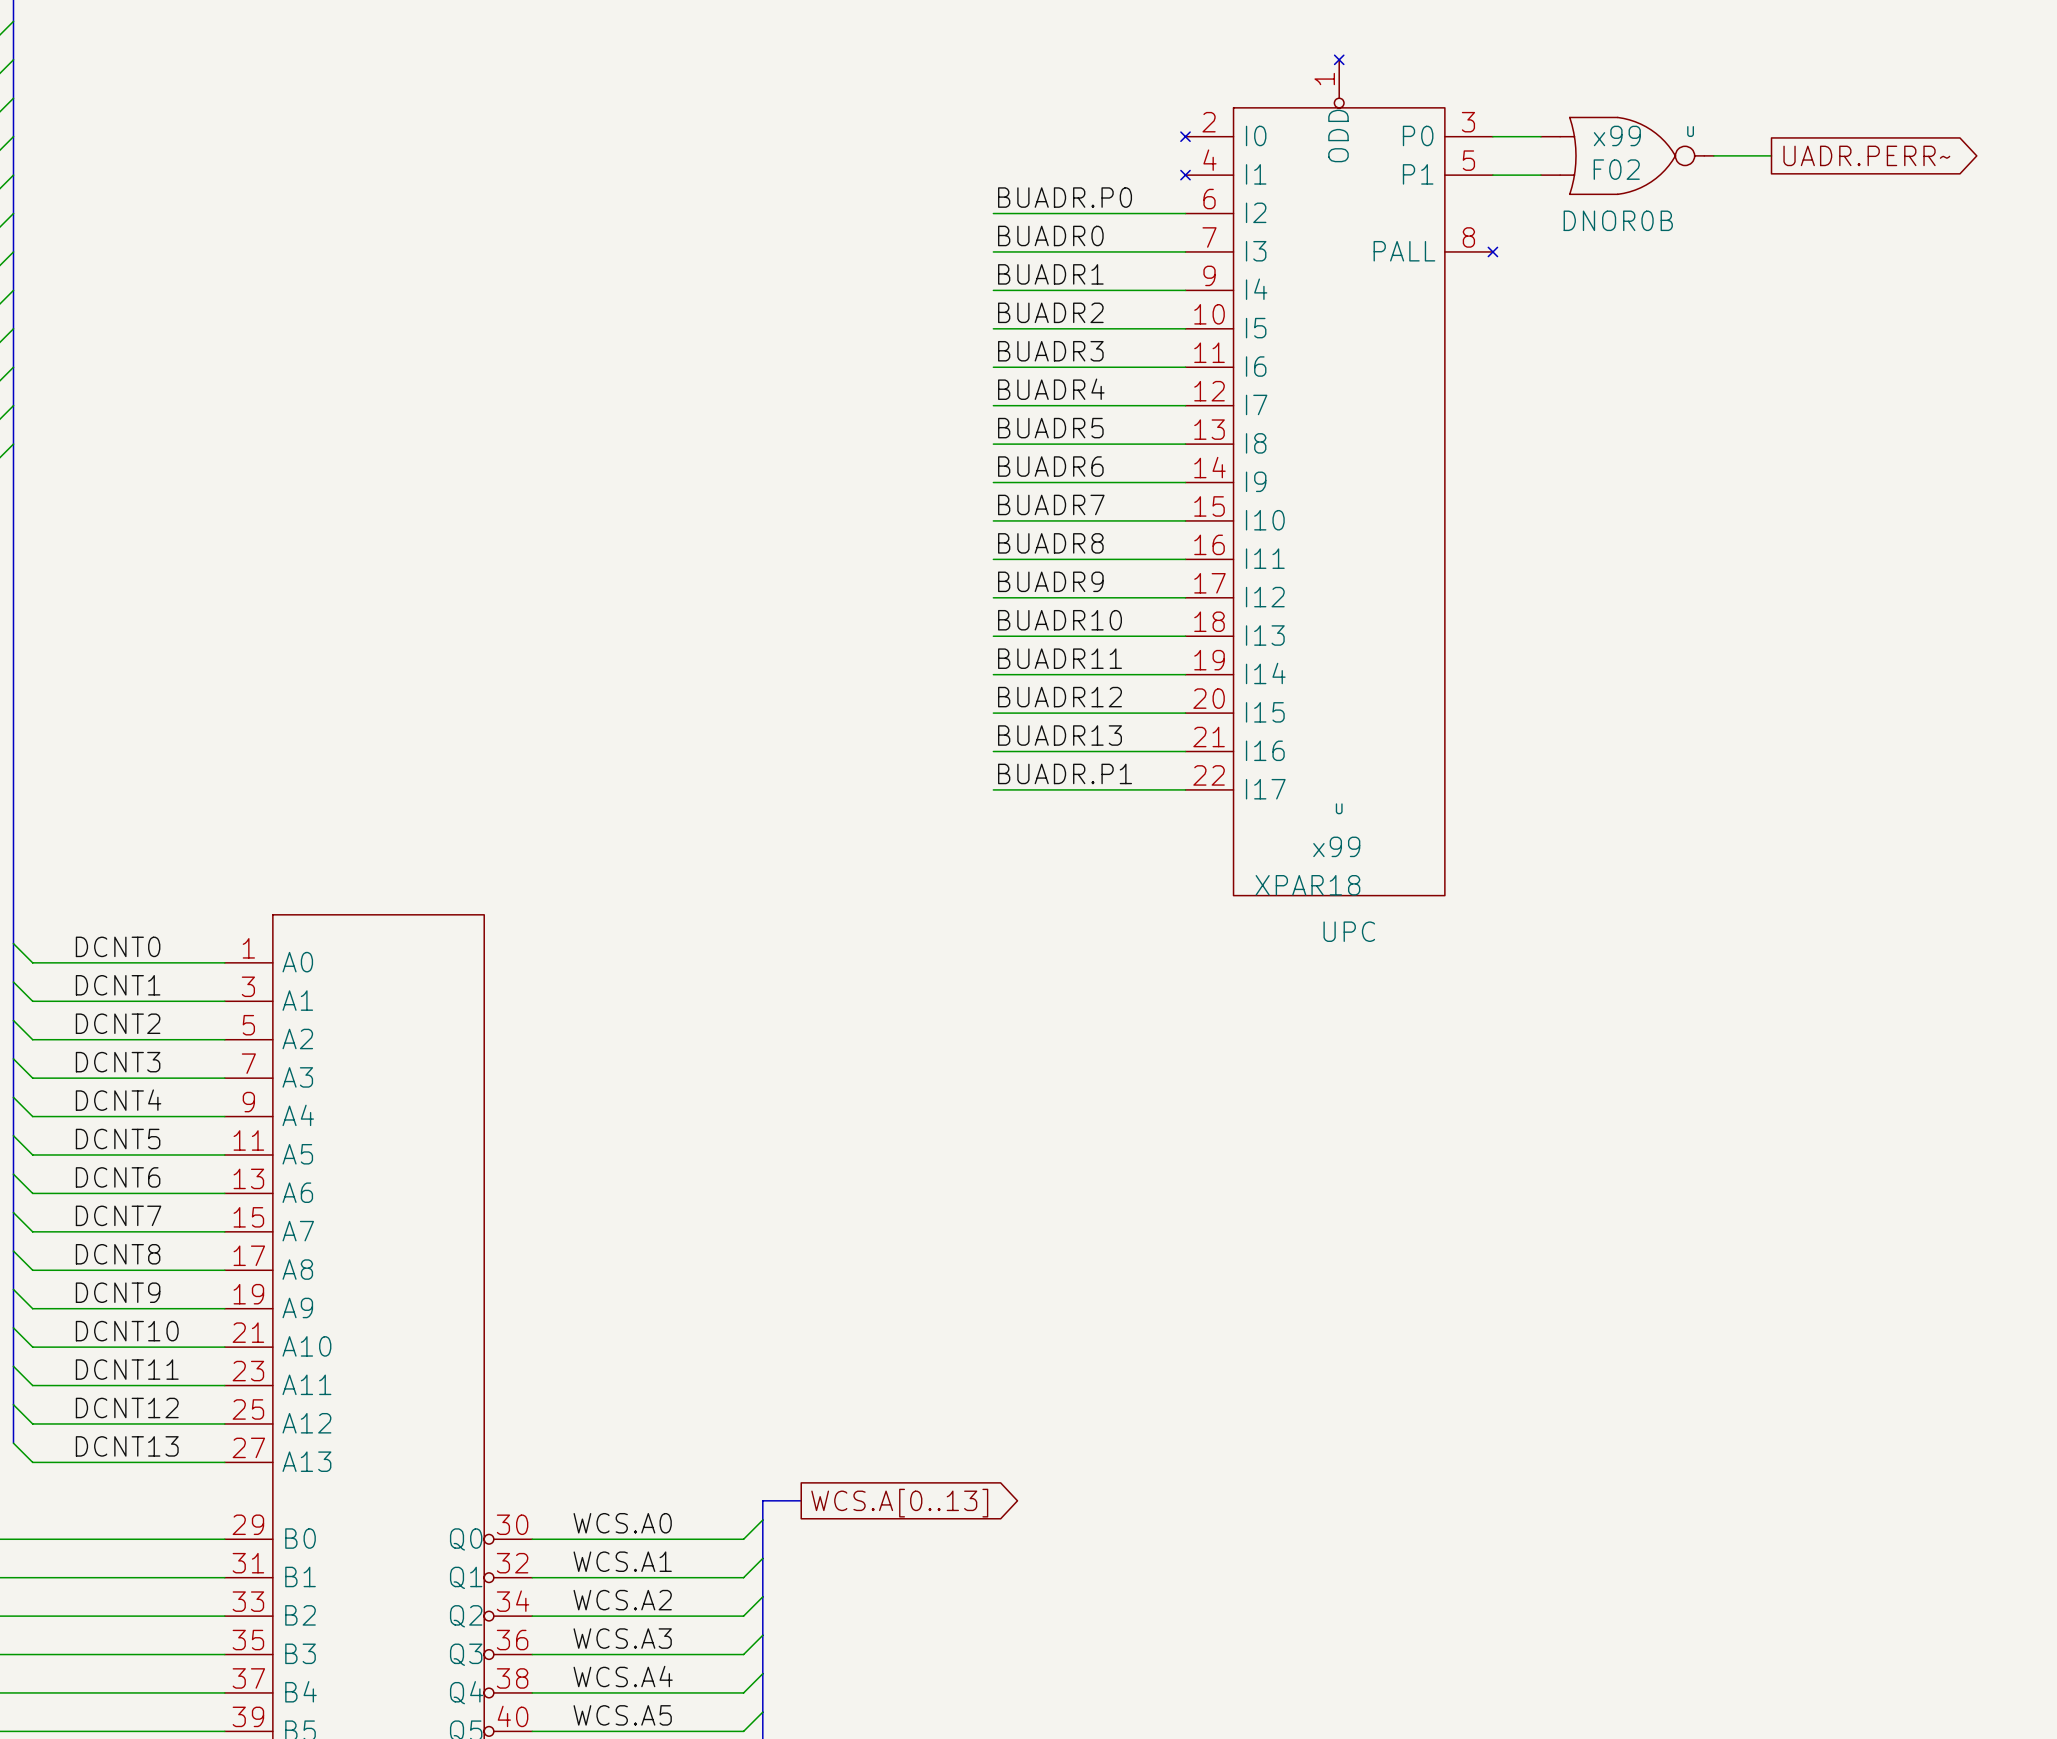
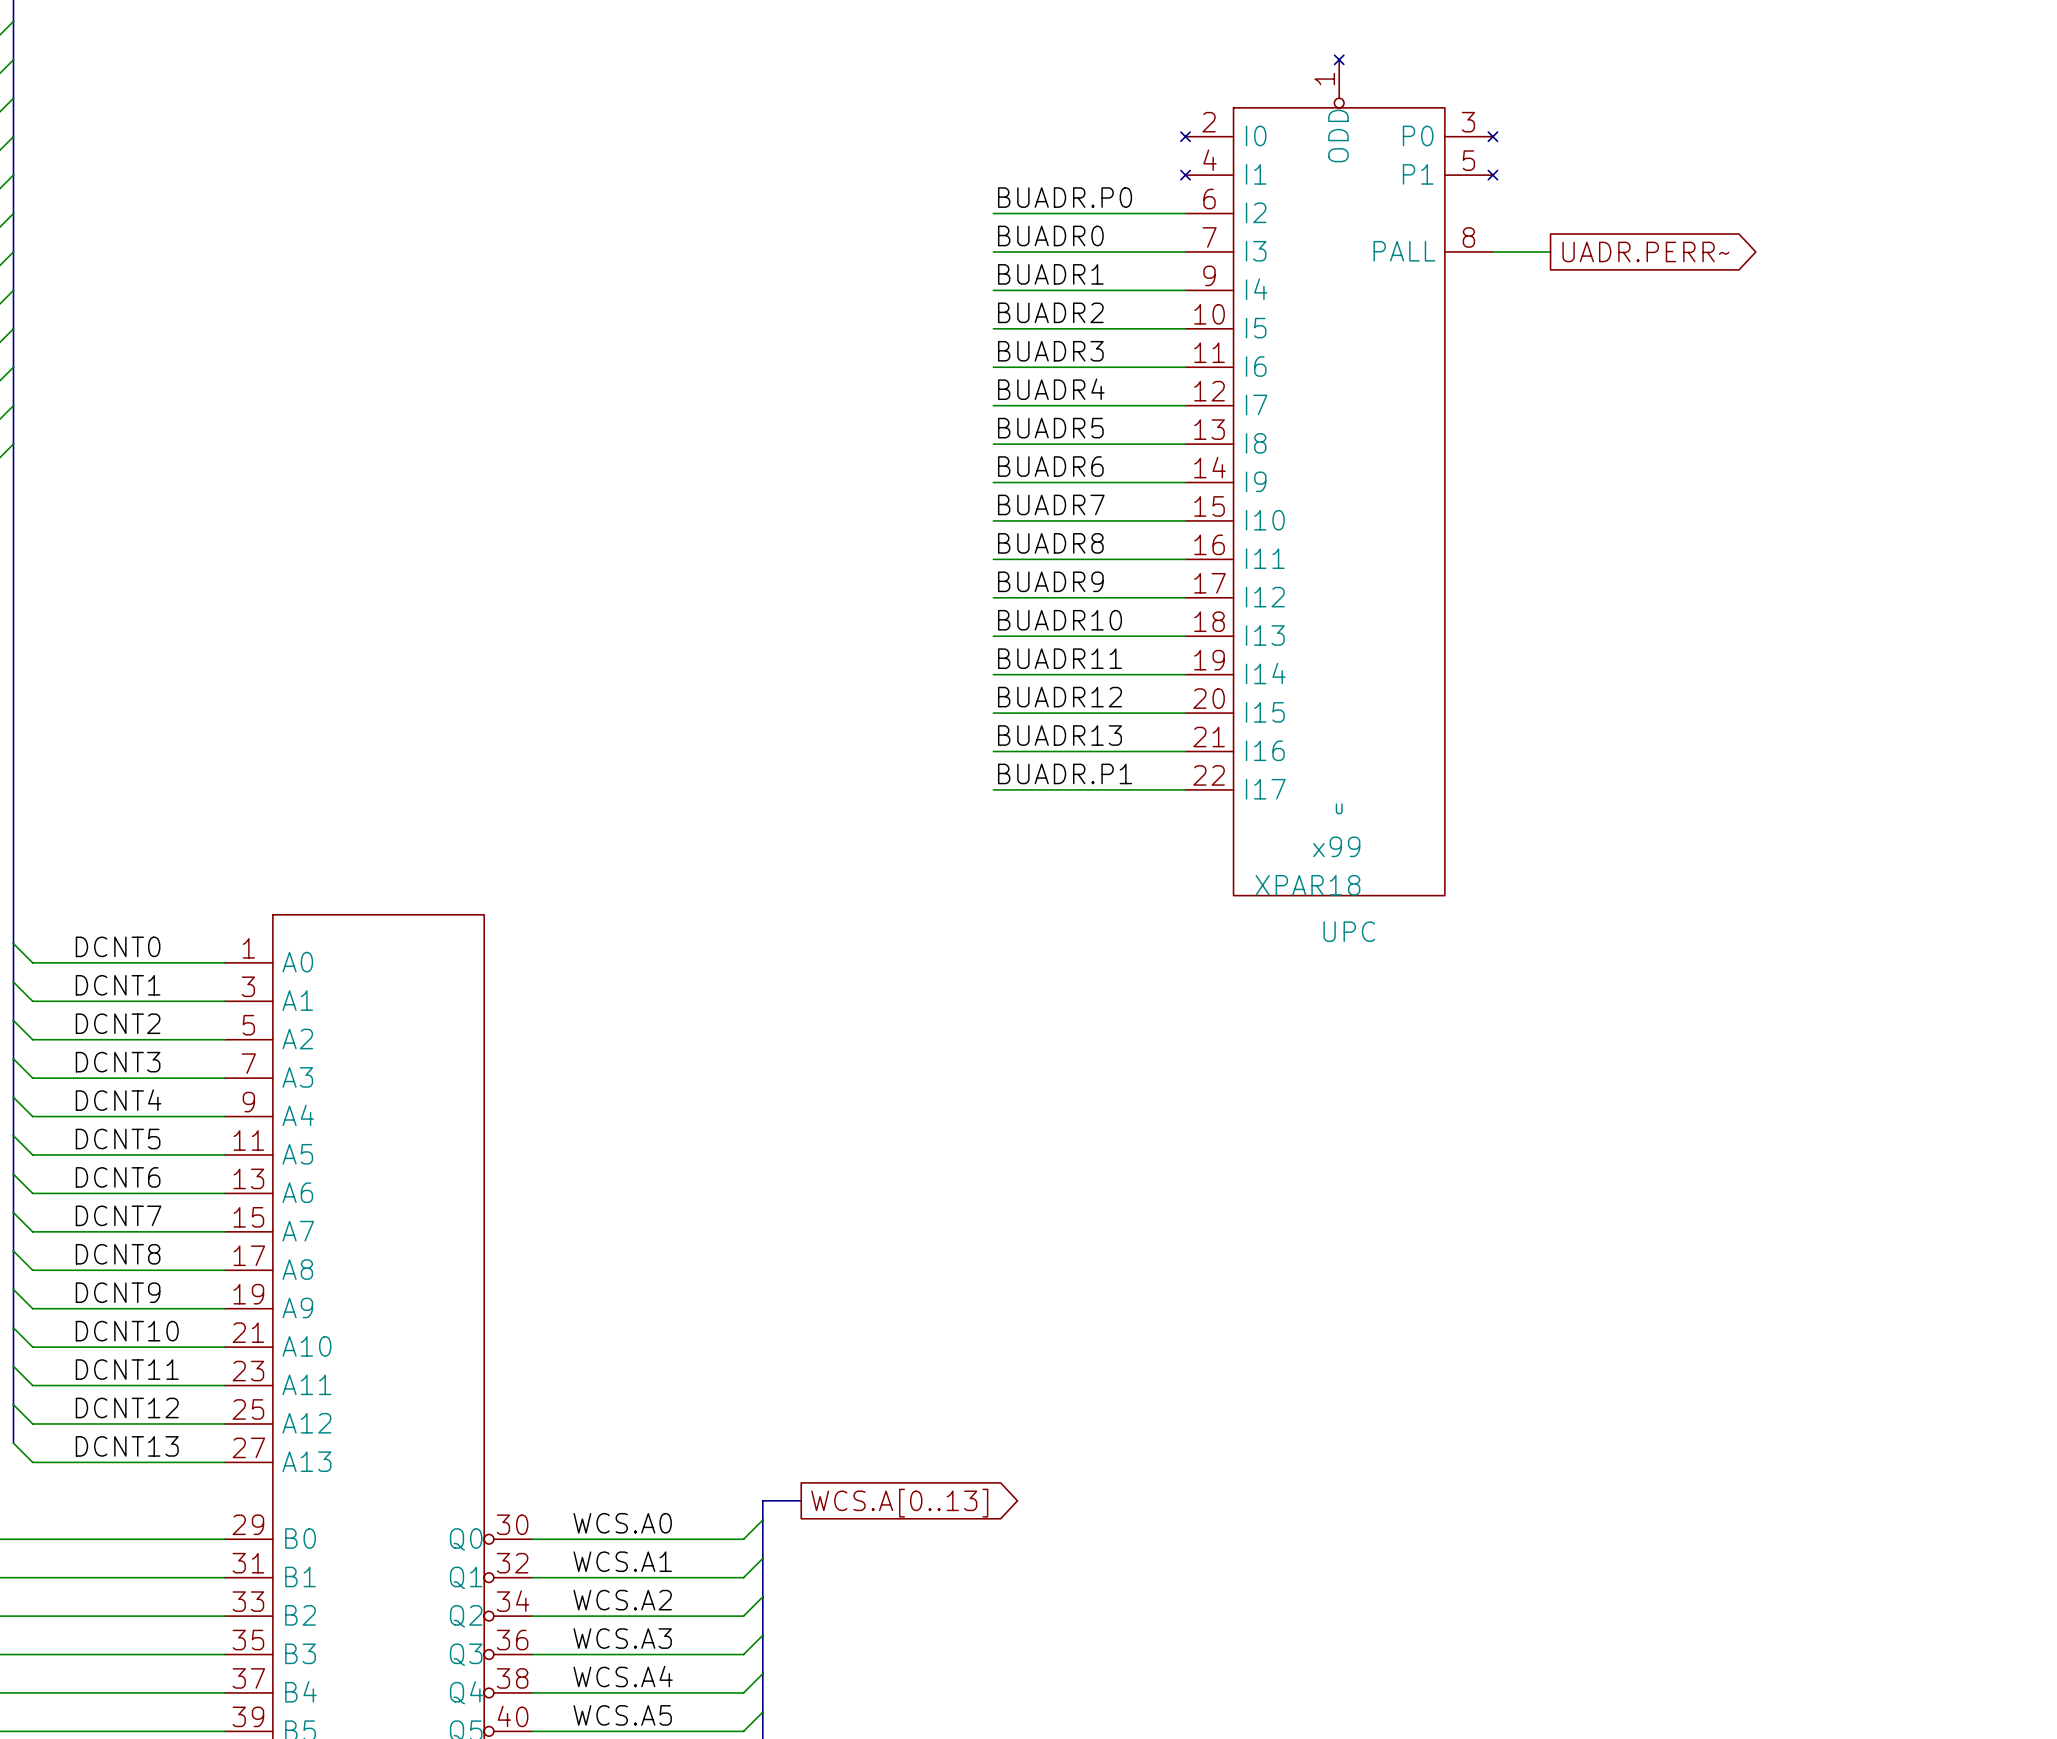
wire: (1492, 136) (1540, 136) -> none
no-connect mark: none -> (1492, 136)
U: F02 (1627, 155) -> none
wire: (1713, 155) (1771, 155) -> none
global label: UADR.PERR~ (1866, 155) -> none
wire: (1492, 175) (1540, 175) -> none
no-connect mark: none -> (1492, 175)
wire: none -> (1492, 251) (1550, 251)
no-connect mark: (1492, 251) -> none
global label: none -> UADR.PERR~ (1645, 251)

